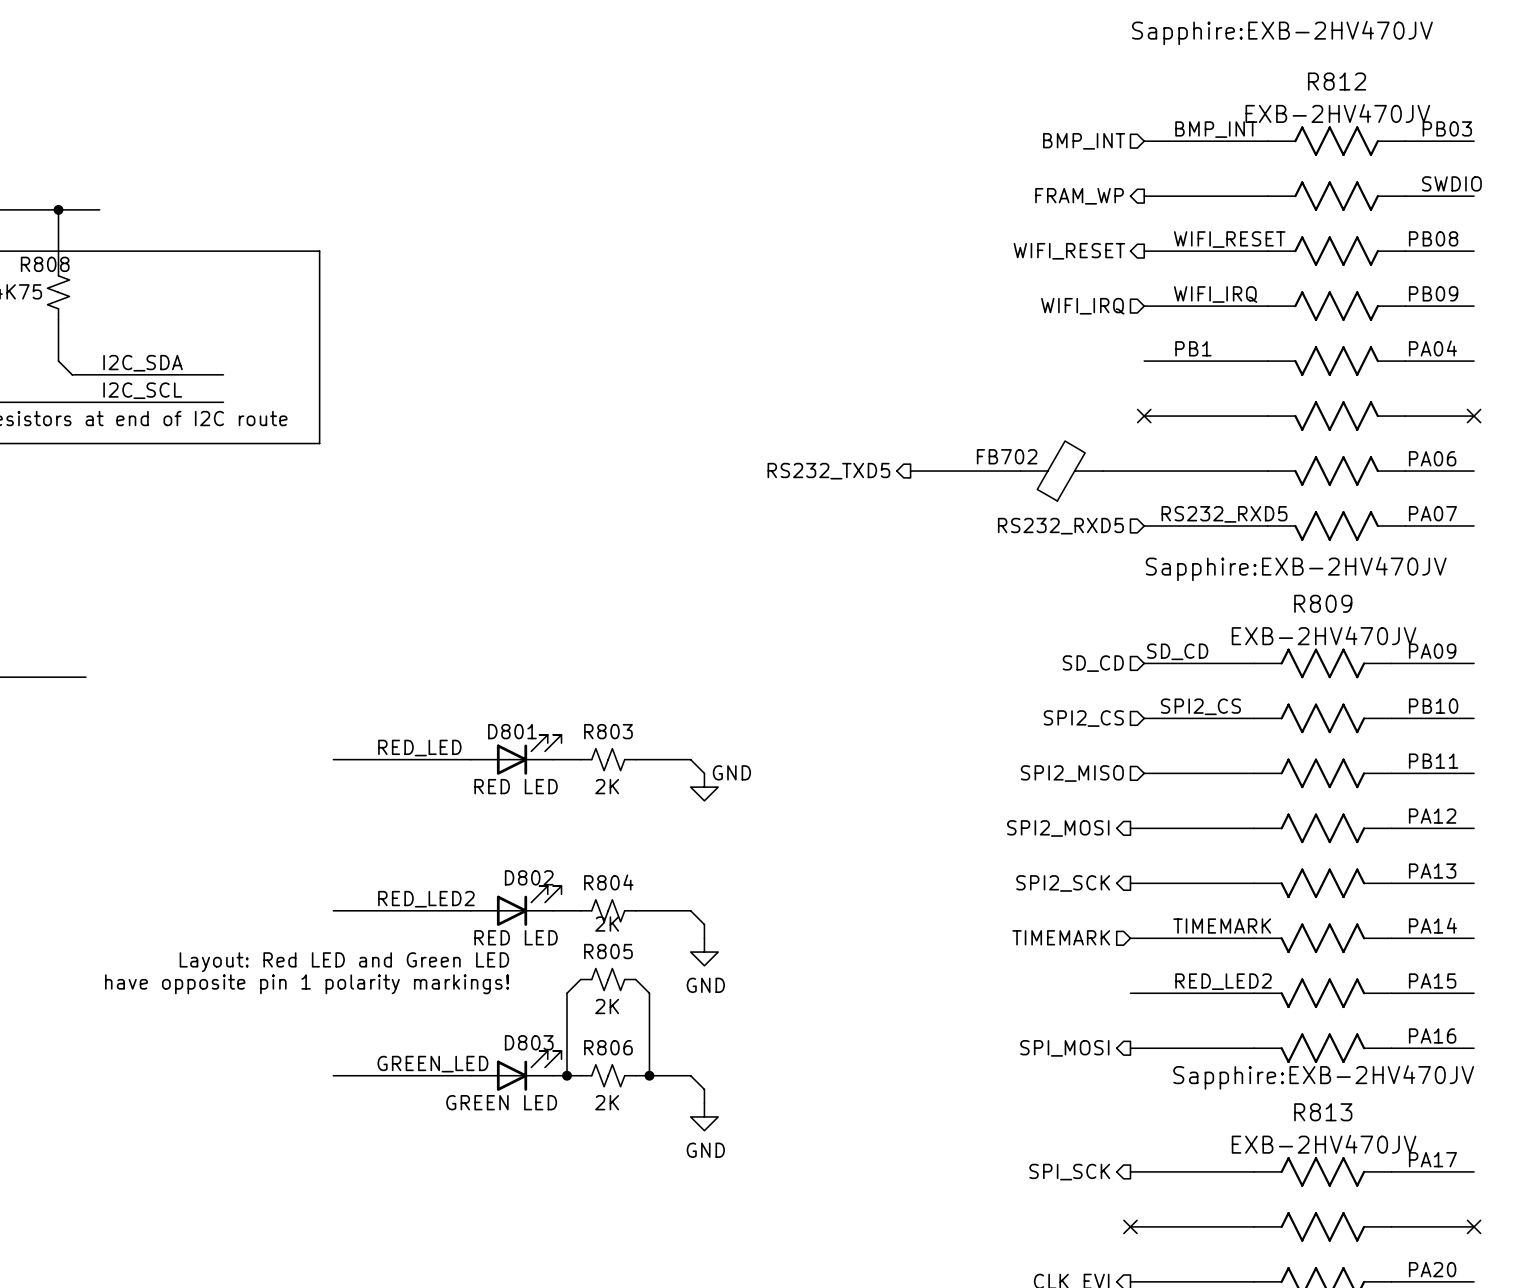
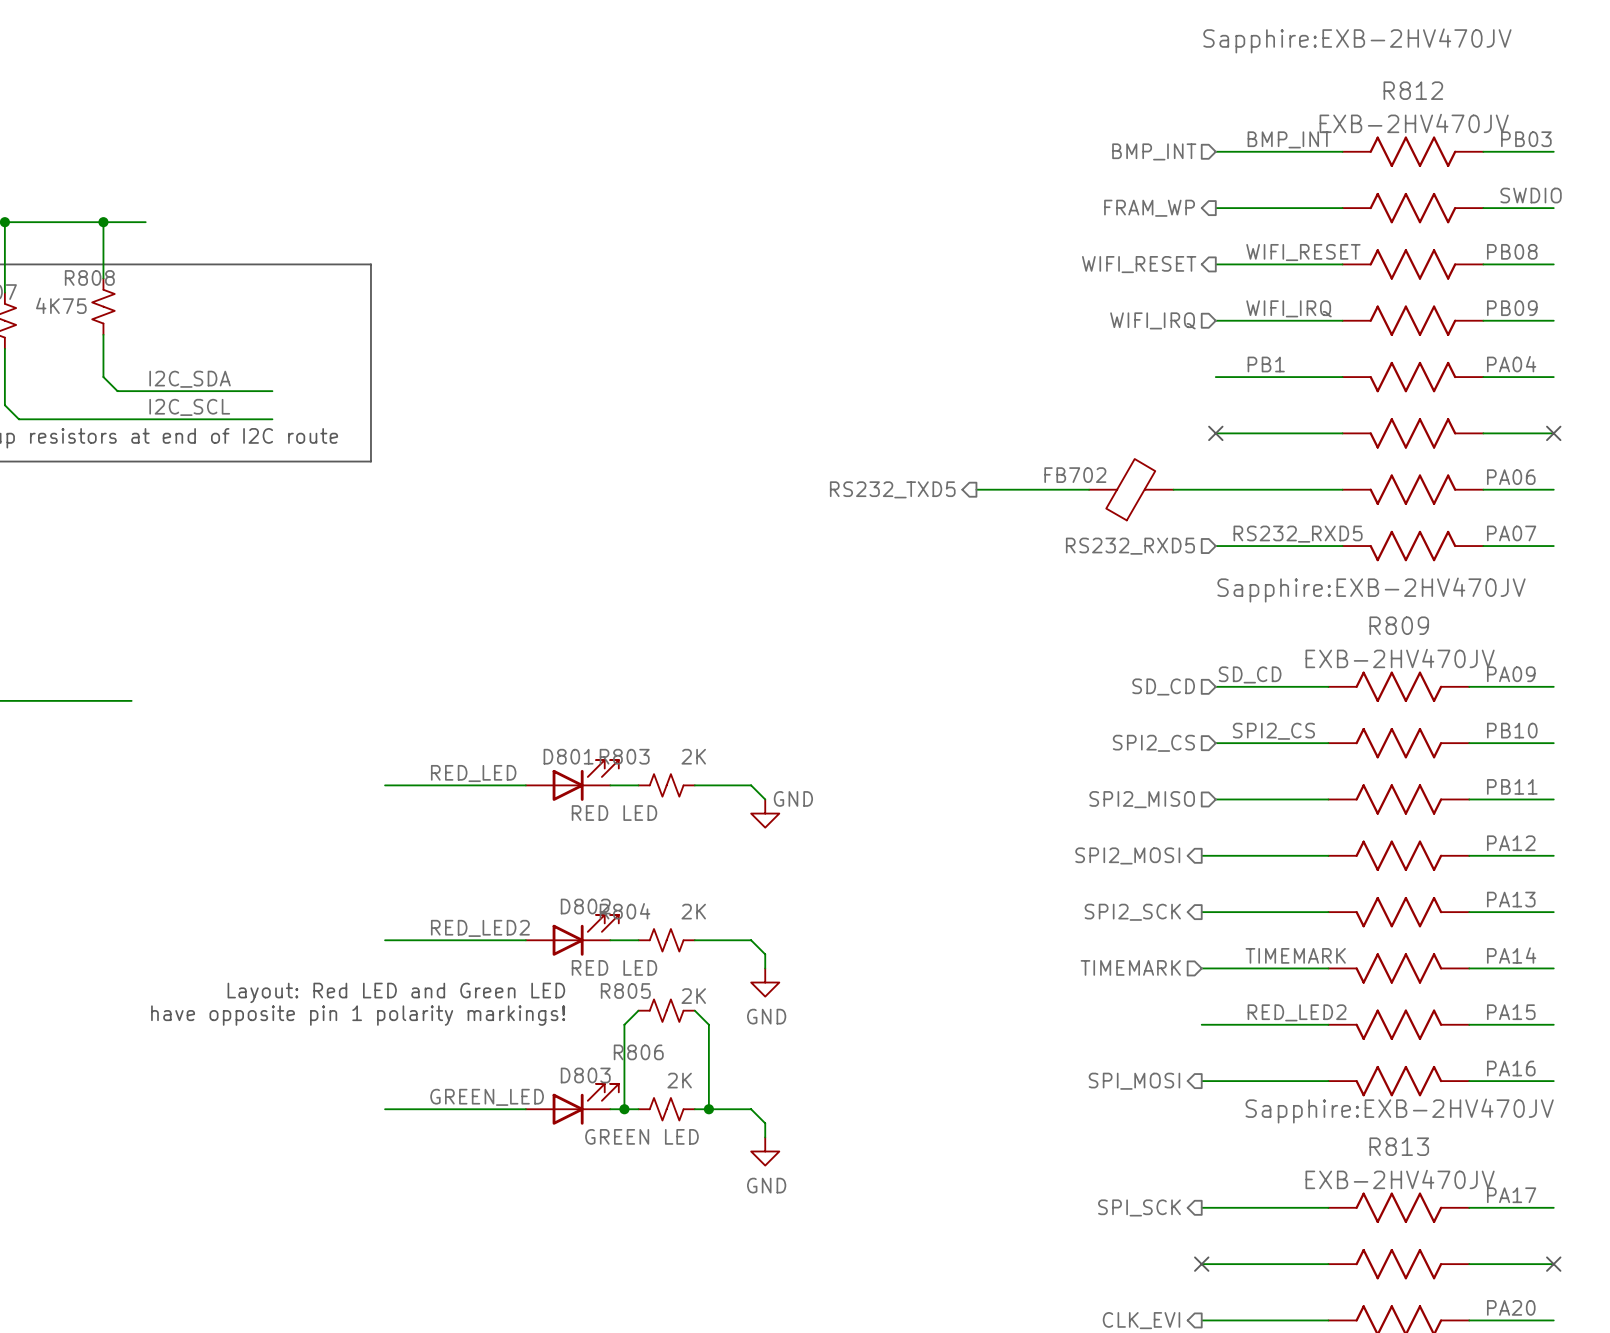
R803 name position: R803 (608, 731) -> R803 (624, 756)
D801 value position: RED LED (516, 786) -> RED LED (614, 813)
R803 value position: 2K (607, 786) -> 2K (693, 756)
R804 name position: R804 (608, 882) -> R804 (625, 911)
R804 value position: 2K (607, 924) -> 2K (693, 911)
D802 value position: RED LED (516, 937) -> RED LED (614, 967)
R805 name position: R805 (608, 951) -> R805 (625, 991)
R805 value position: 2K (607, 1006) -> 2K (693, 996)
R806 name position: R806 (608, 1047) -> R806 (638, 1052)
D803 value position: GREEN LED (501, 1102) -> GREEN LED (641, 1136)
R806 value position: 2K (607, 1102) -> 2K (679, 1080)

